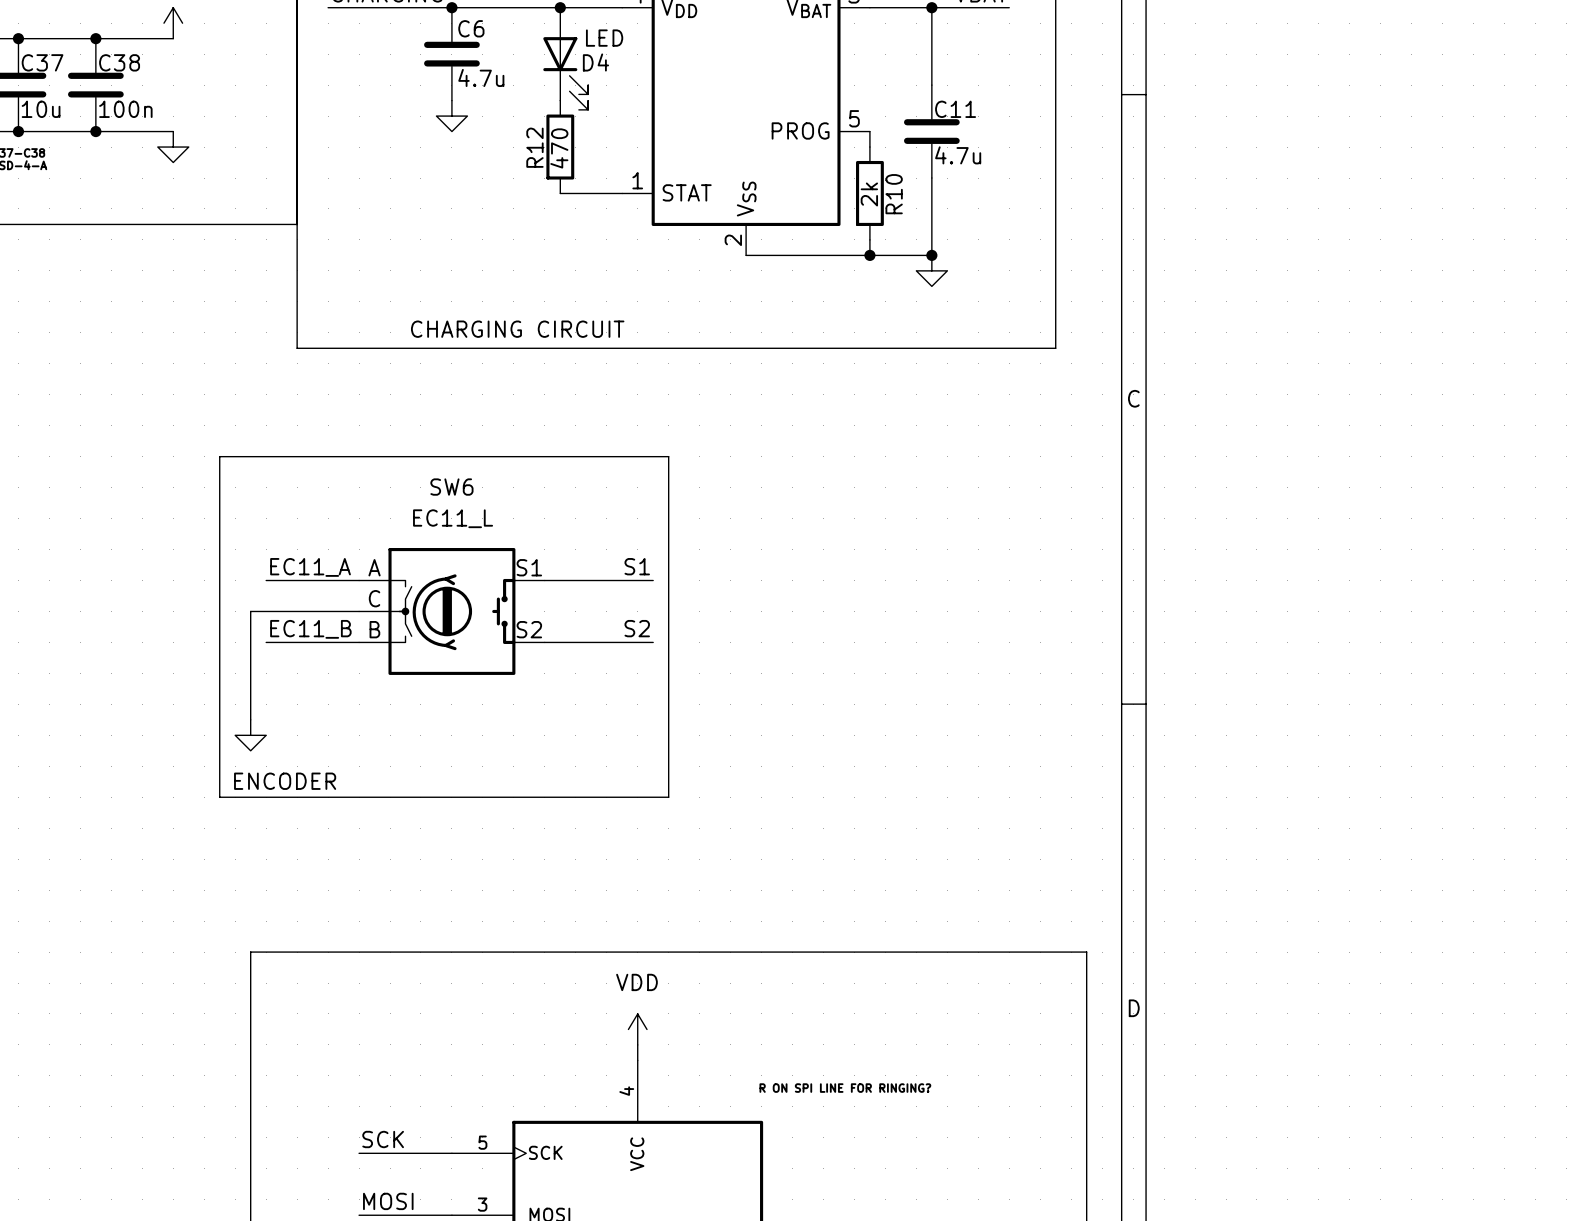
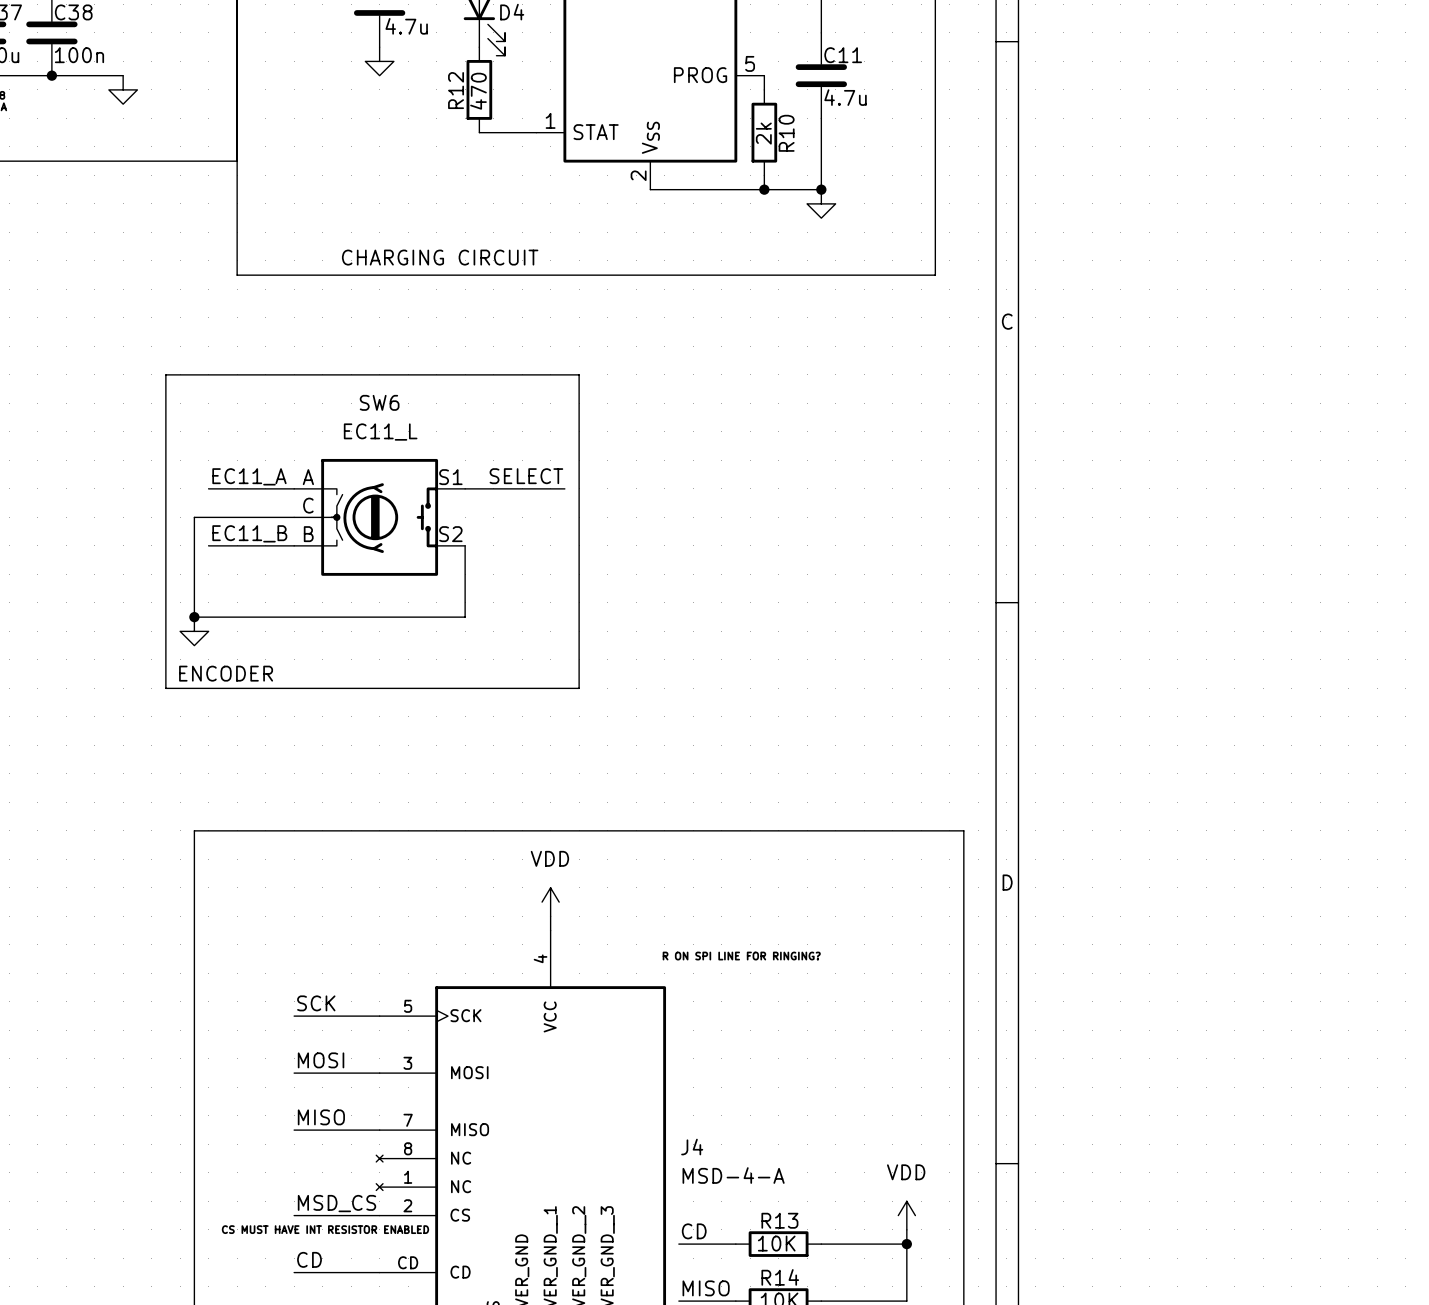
label: S1 (637, 566) -> SELECT (526, 476)
label: S2 (637, 628) -> none
wire: (544, 642) (653, 642) -> (465, 545) (465, 617) (194, 617)
junction: none -> (194, 617)

